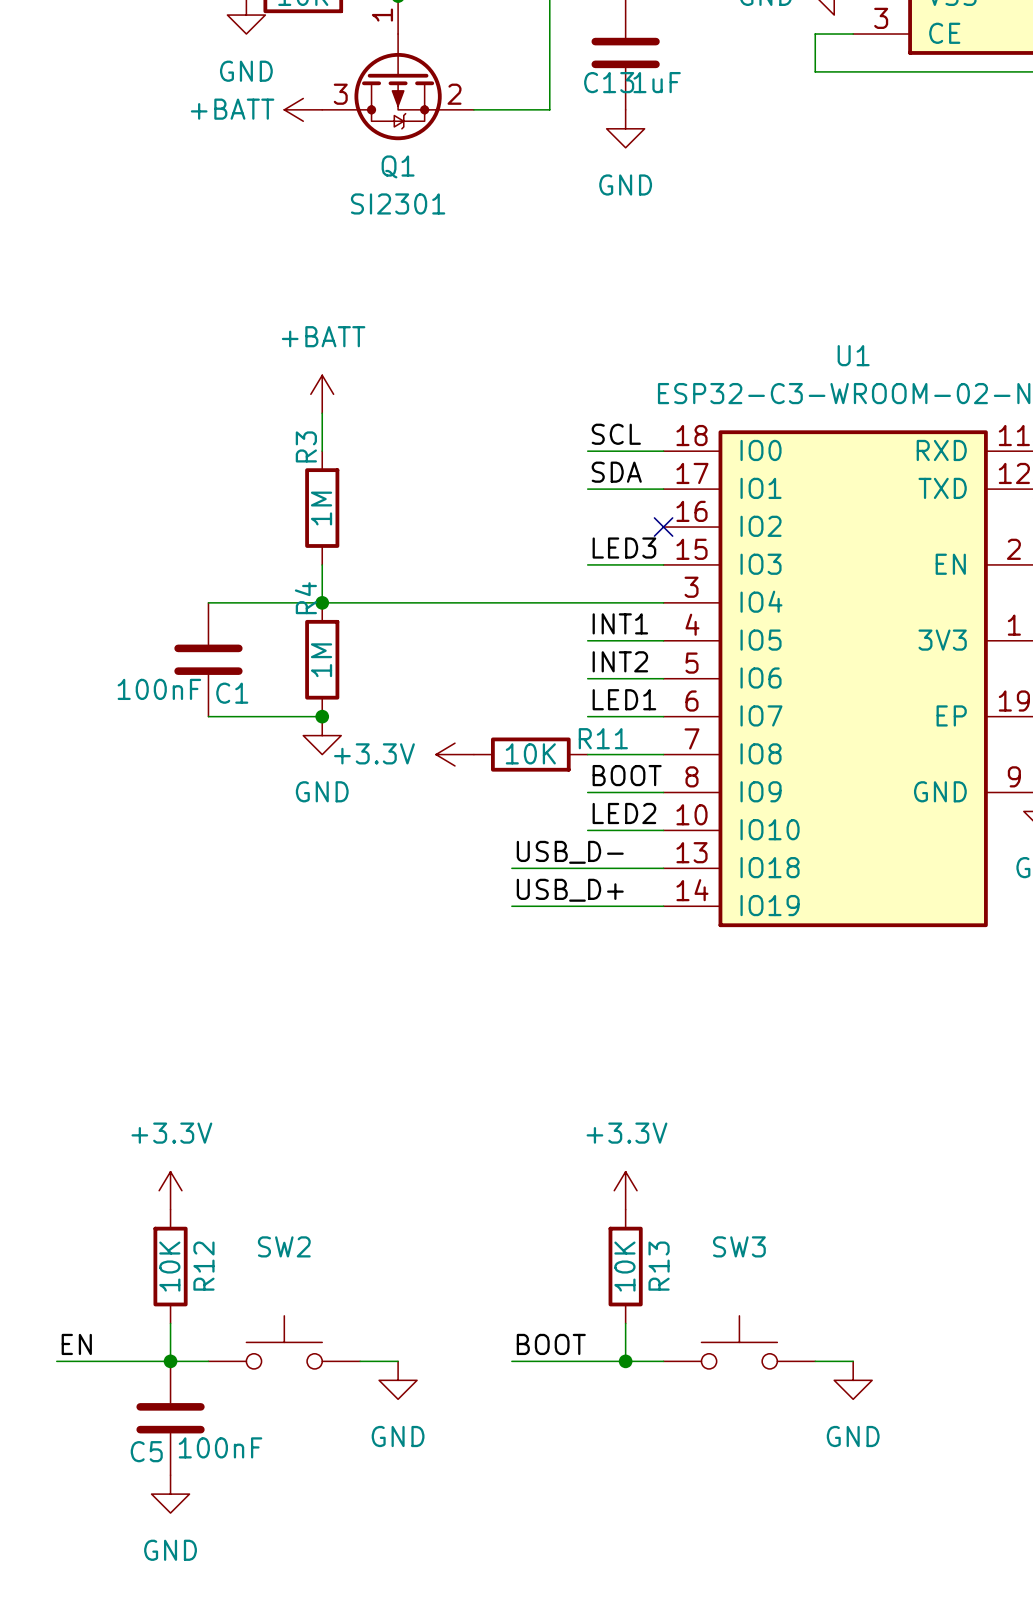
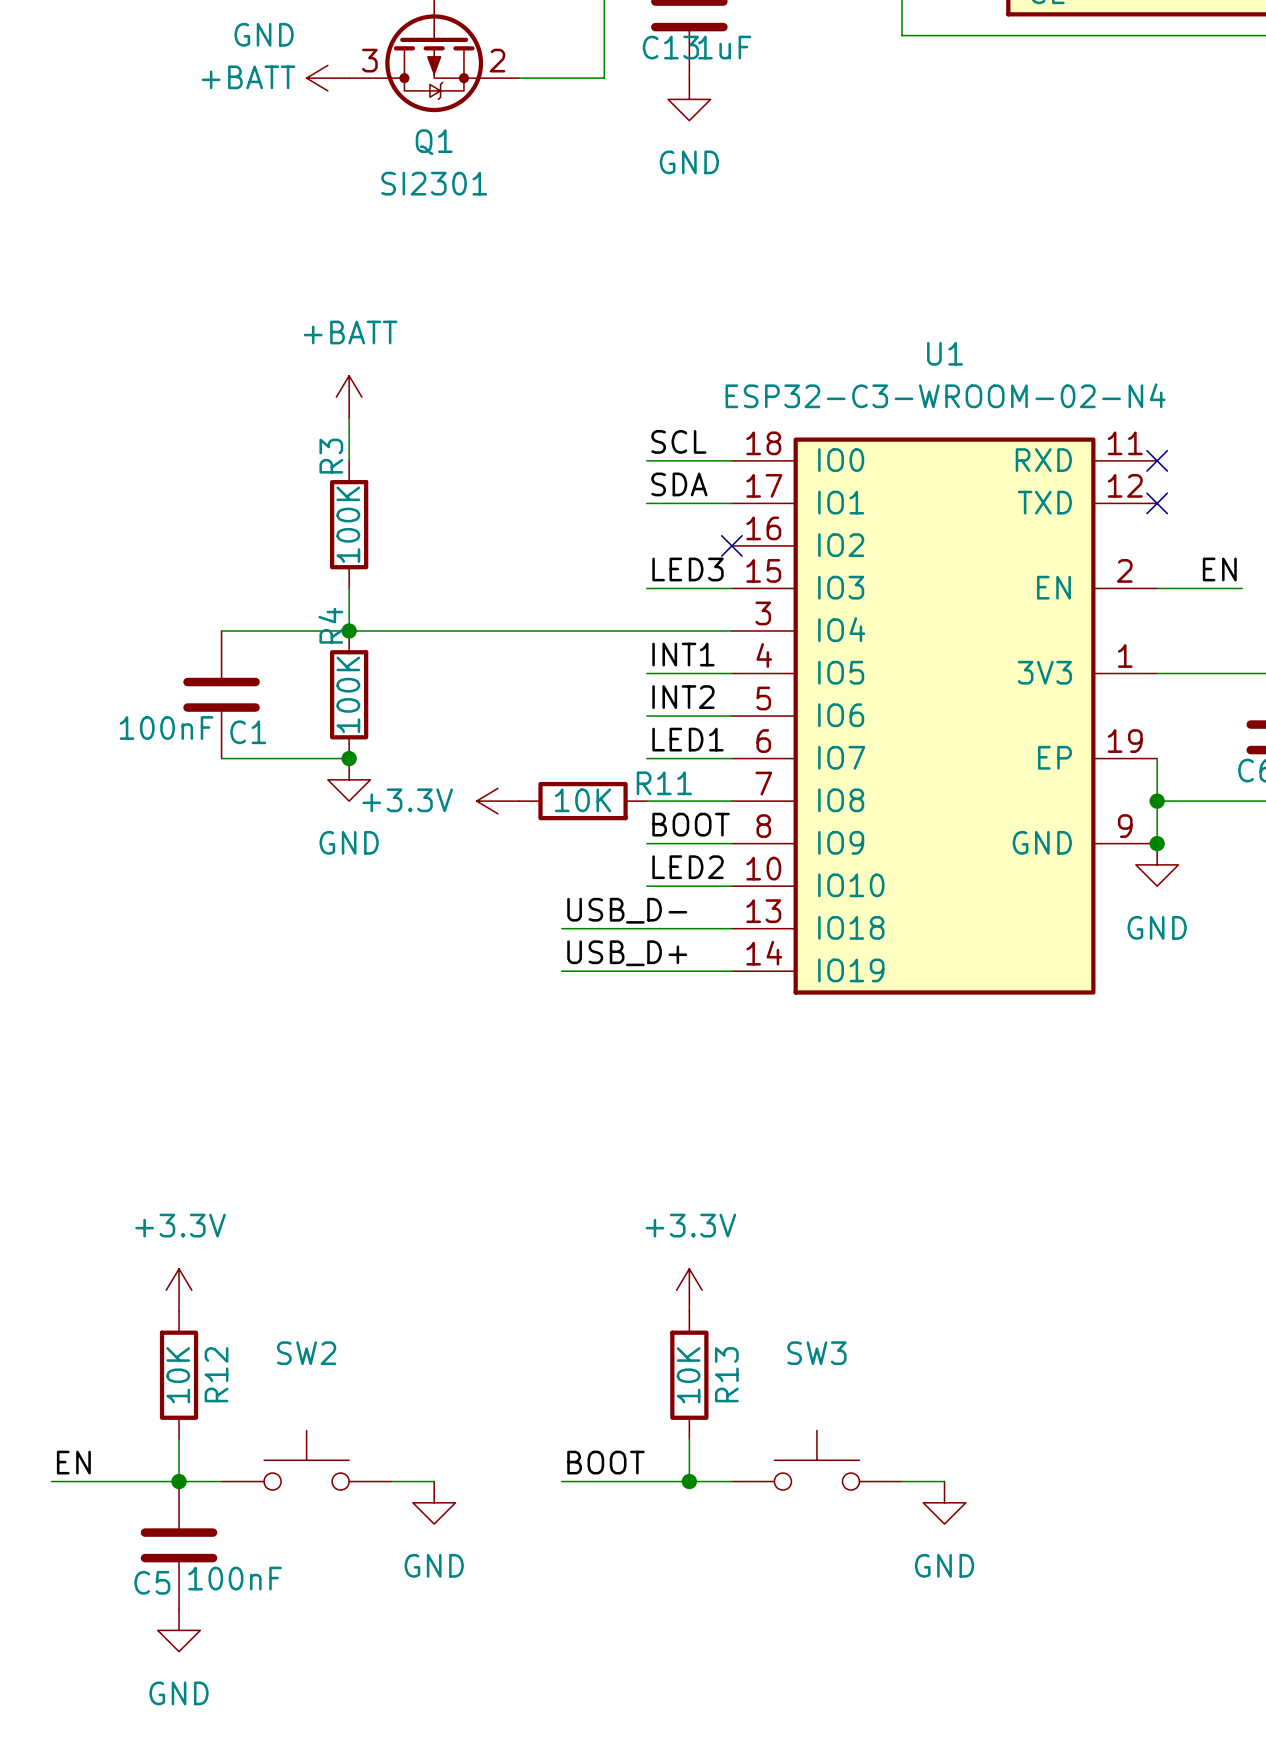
R3 value: 1M (321, 508) -> 100K (348, 524)
R4 value: 1M (321, 660) -> 100K (348, 694)

